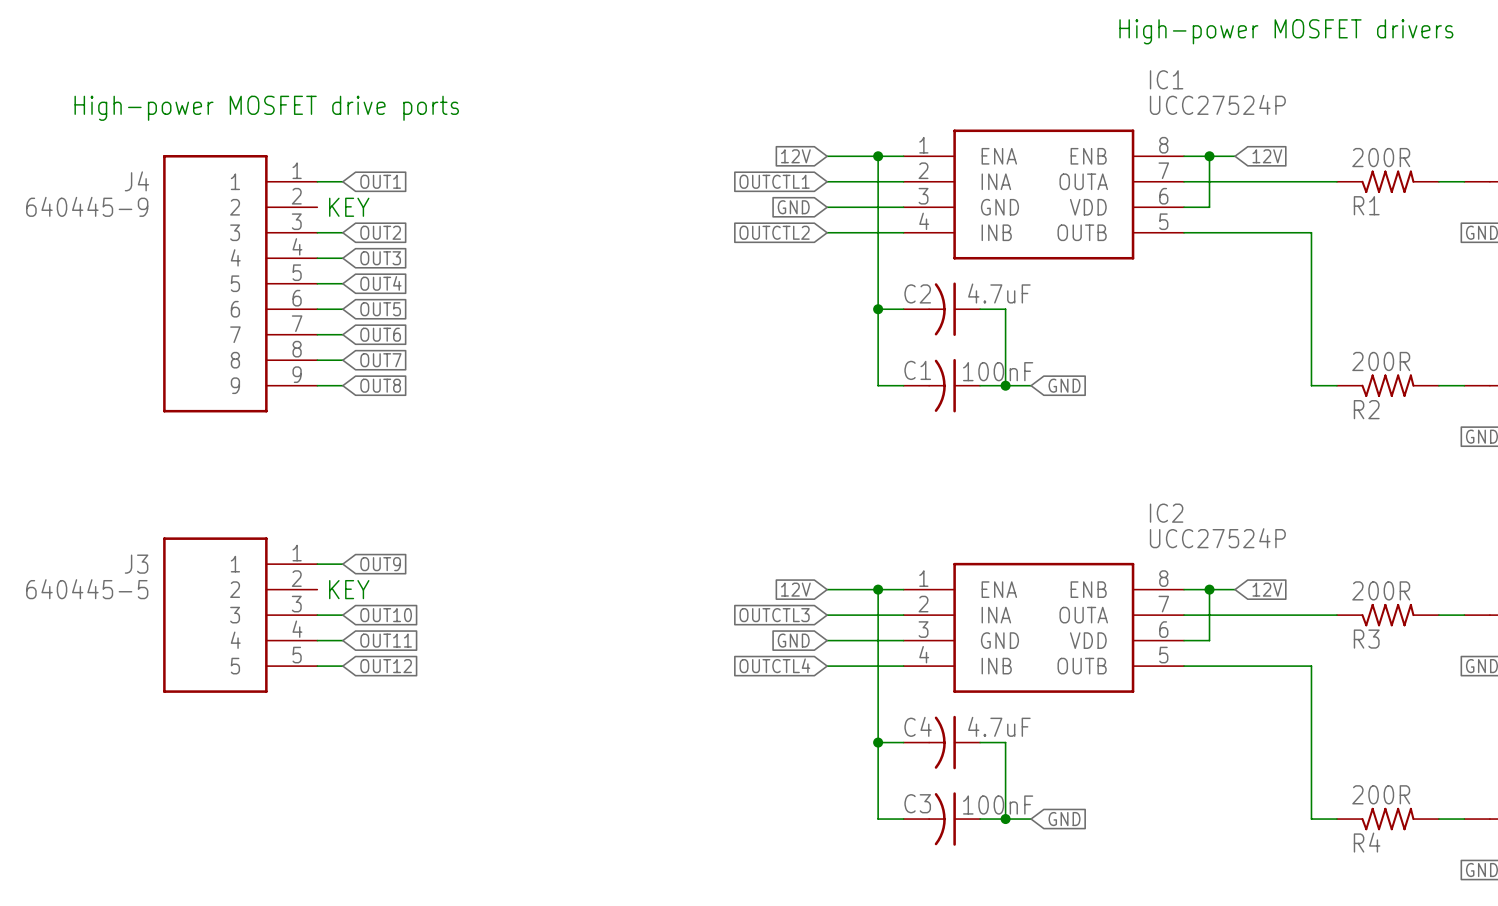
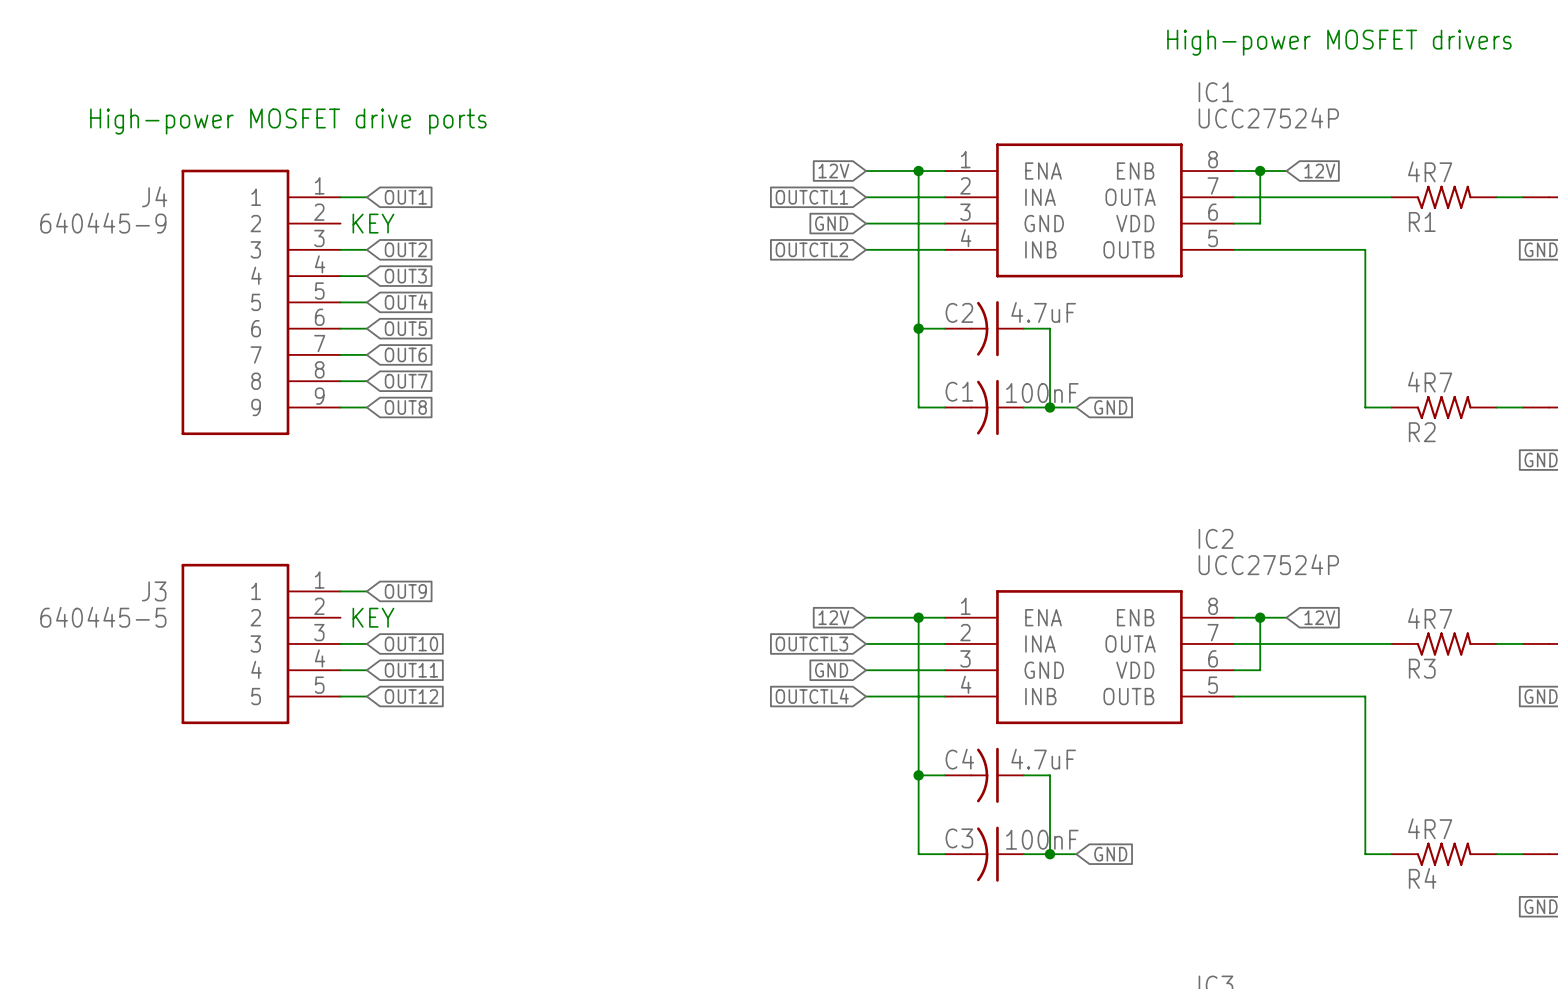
R1 value: 200R (1381, 157) -> 4R7 (1430, 171)
R2 value: 200R (1381, 361) -> 4R7 (1430, 382)
R3 value: 200R (1381, 590) -> 4R7 (1430, 618)
R4 value: 200R (1381, 794) -> 4R7 (1430, 828)

